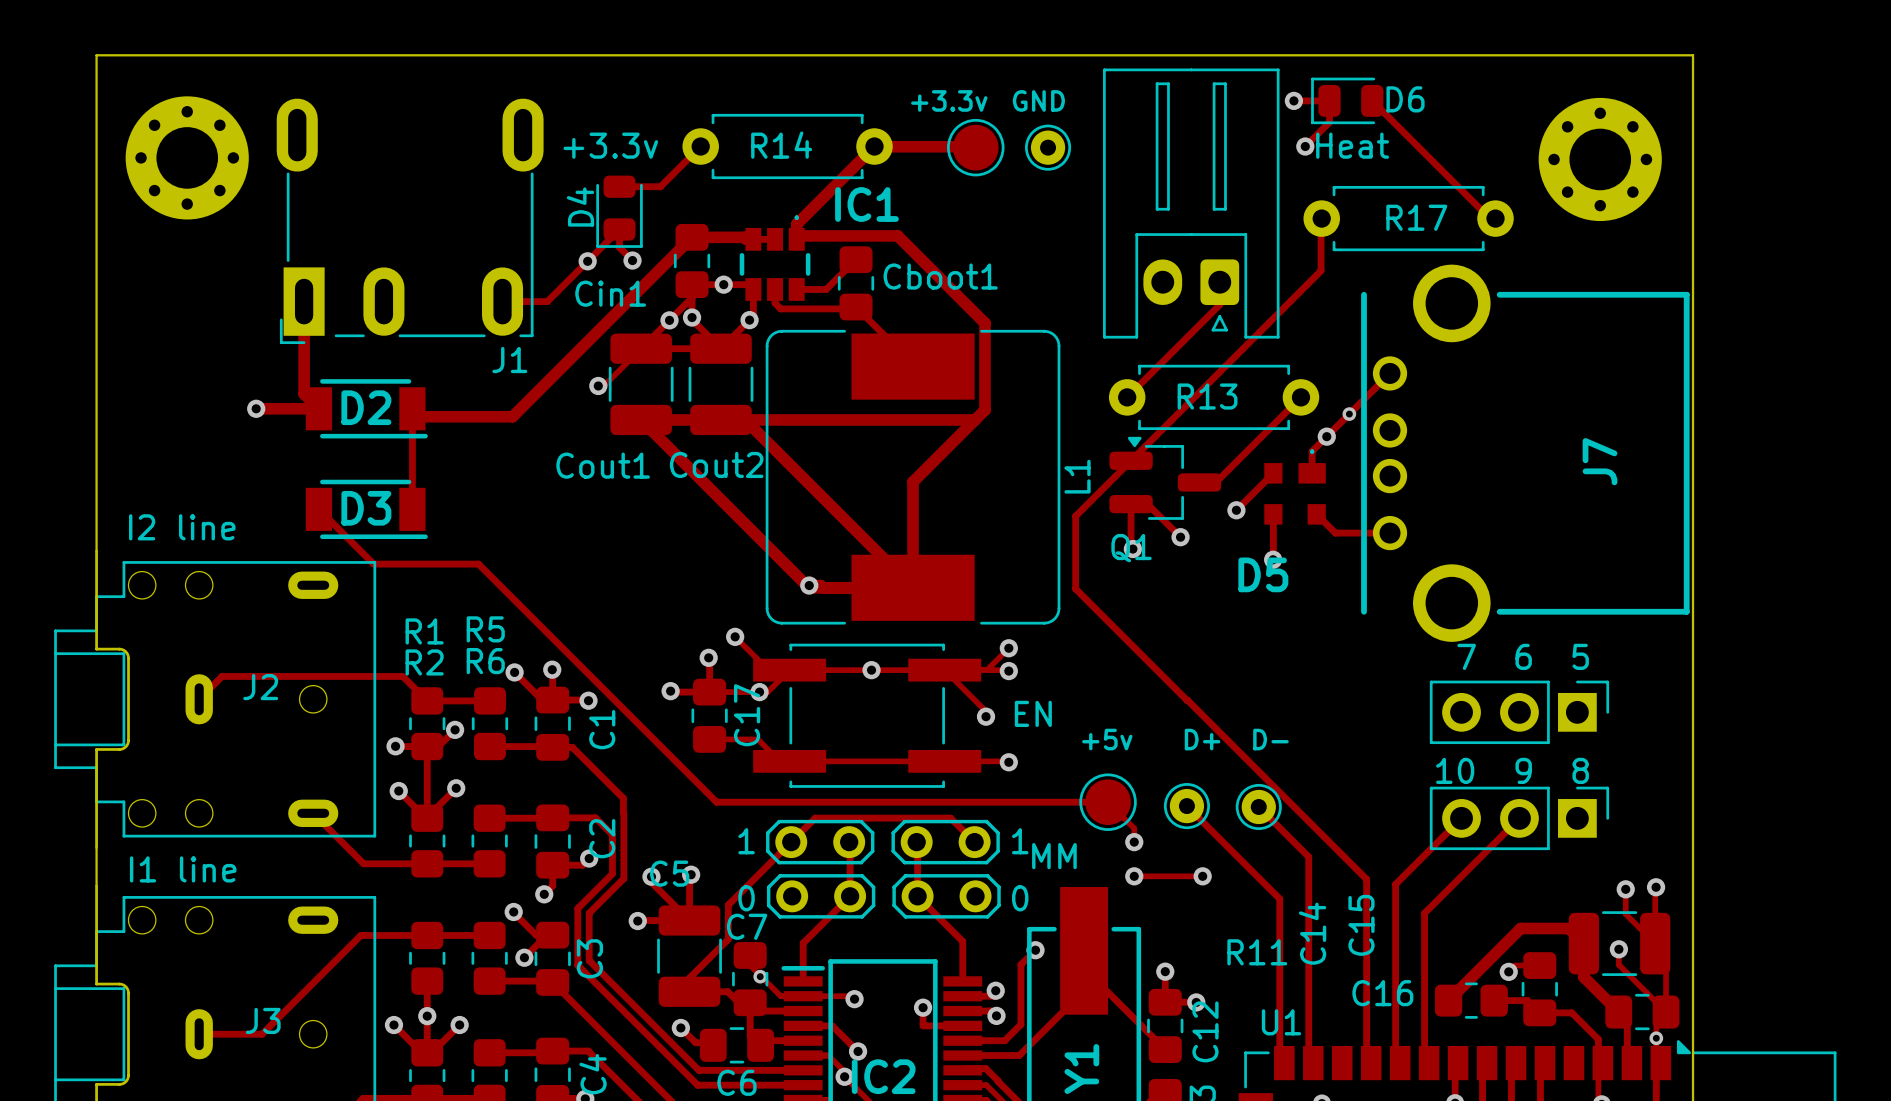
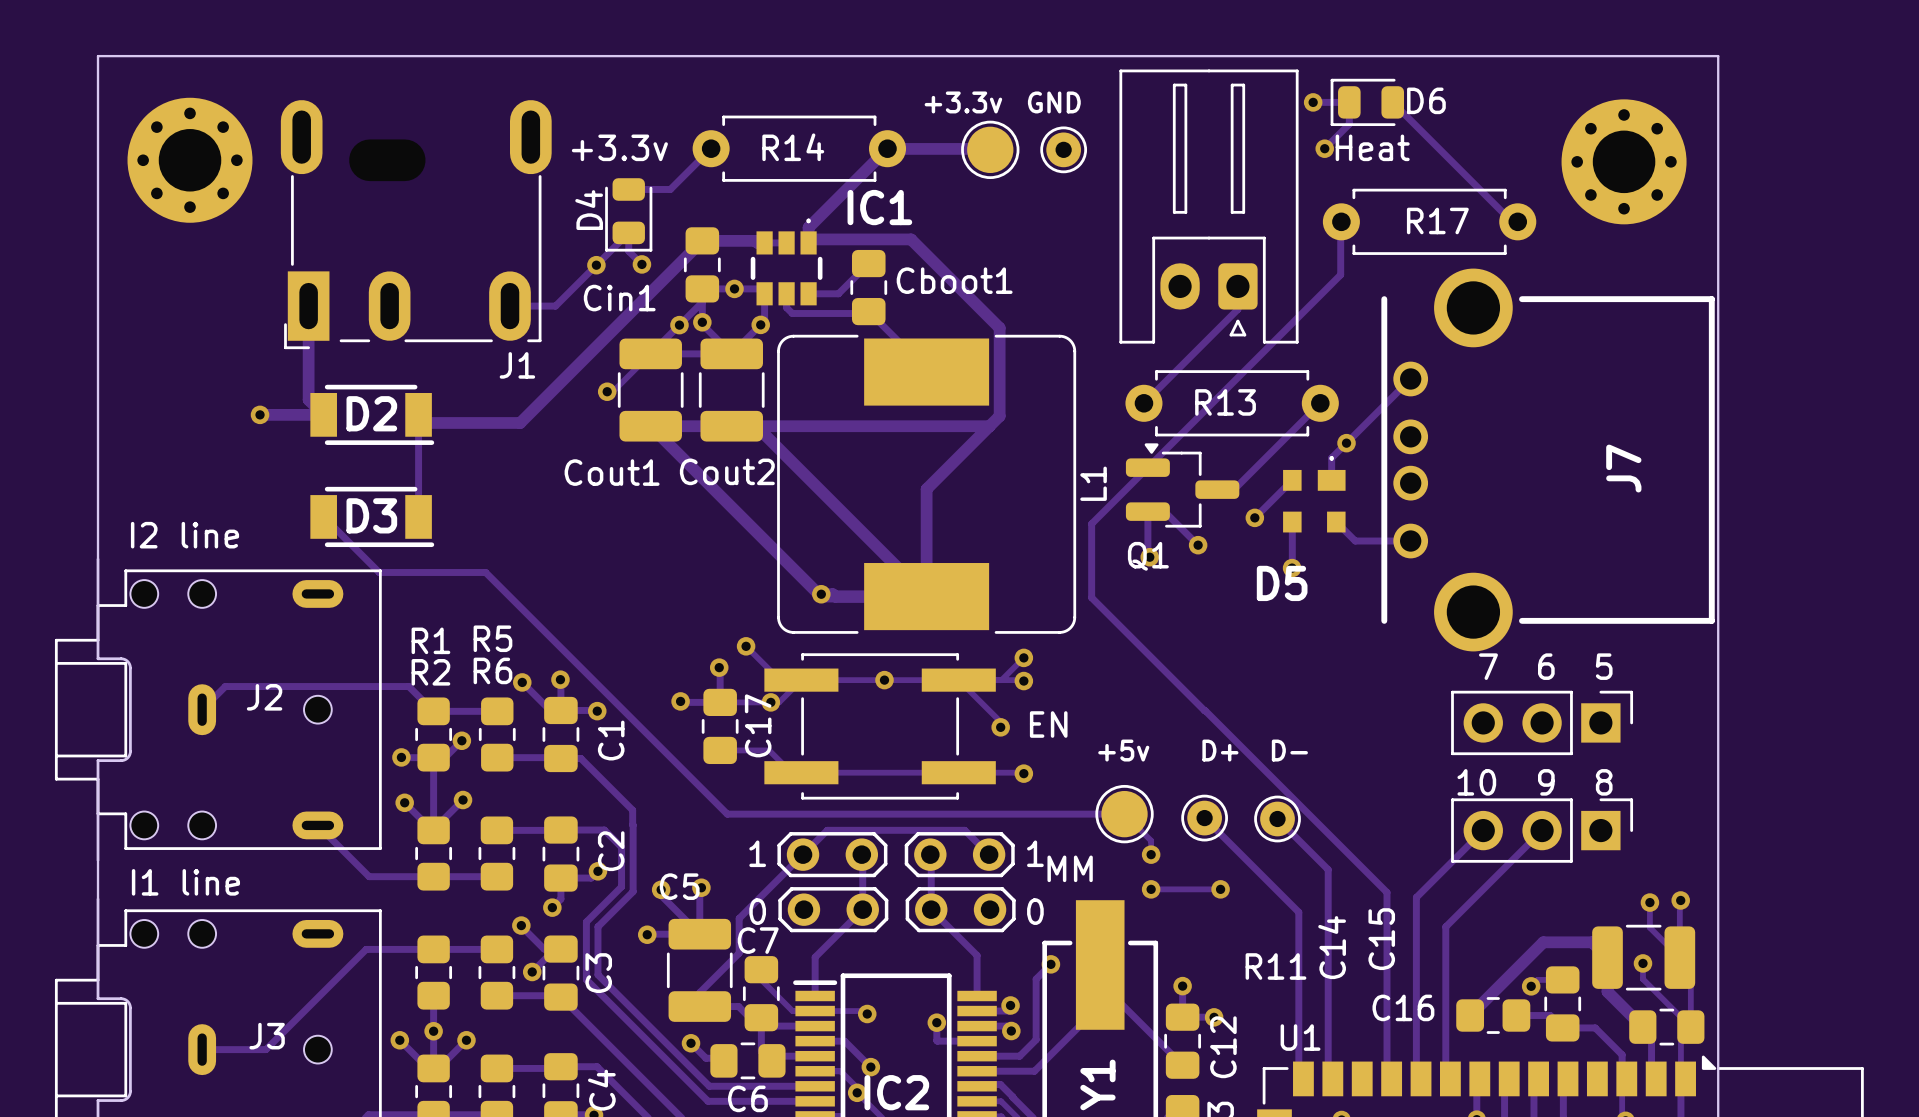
via: (1349, 414) -> none
via: (760, 976) -> none
via: (1656, 1038) -> none

